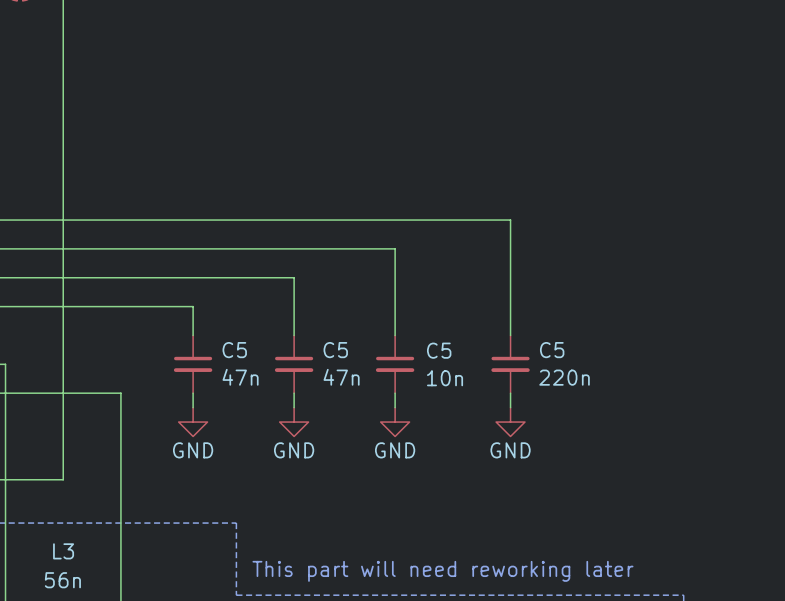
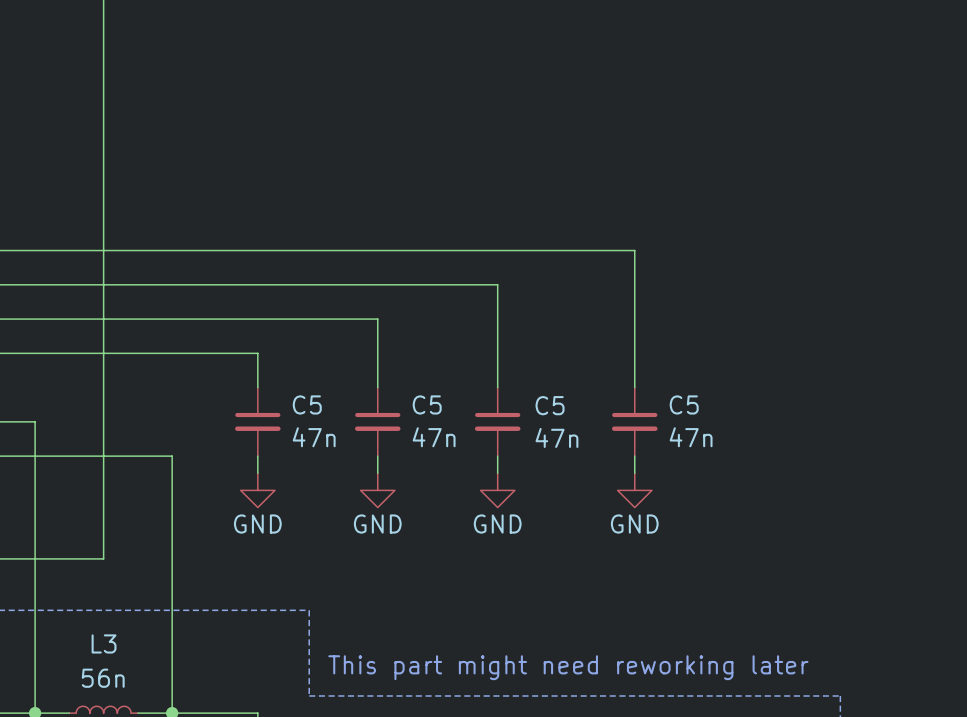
C5 value: 220n (564, 377) -> 47n (691, 437)
C5 value: 10n (445, 378) -> 47n (556, 437)
text: This part will need reworking later (442, 571) -> This part might need reworking later (568, 667)

